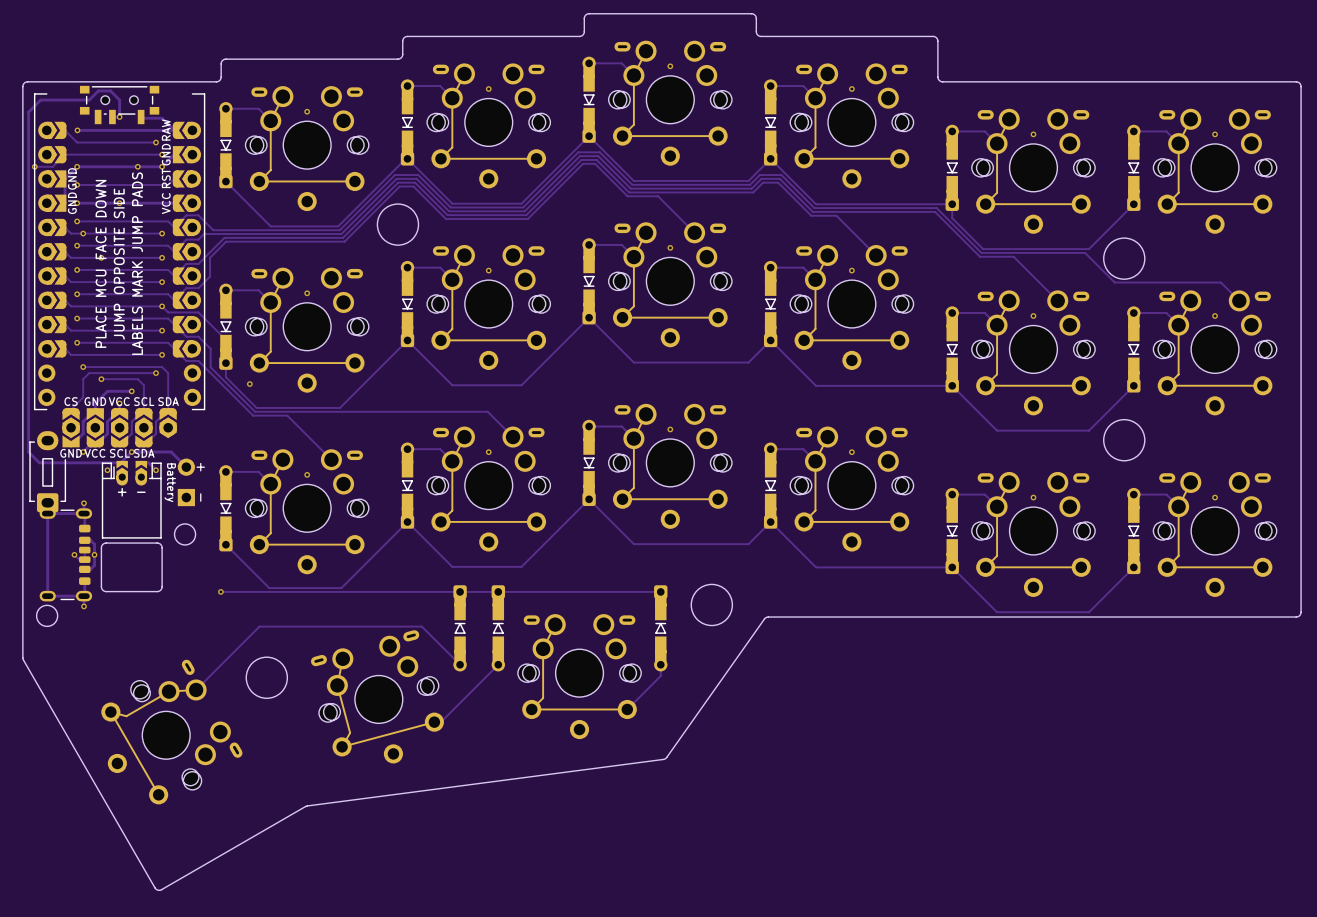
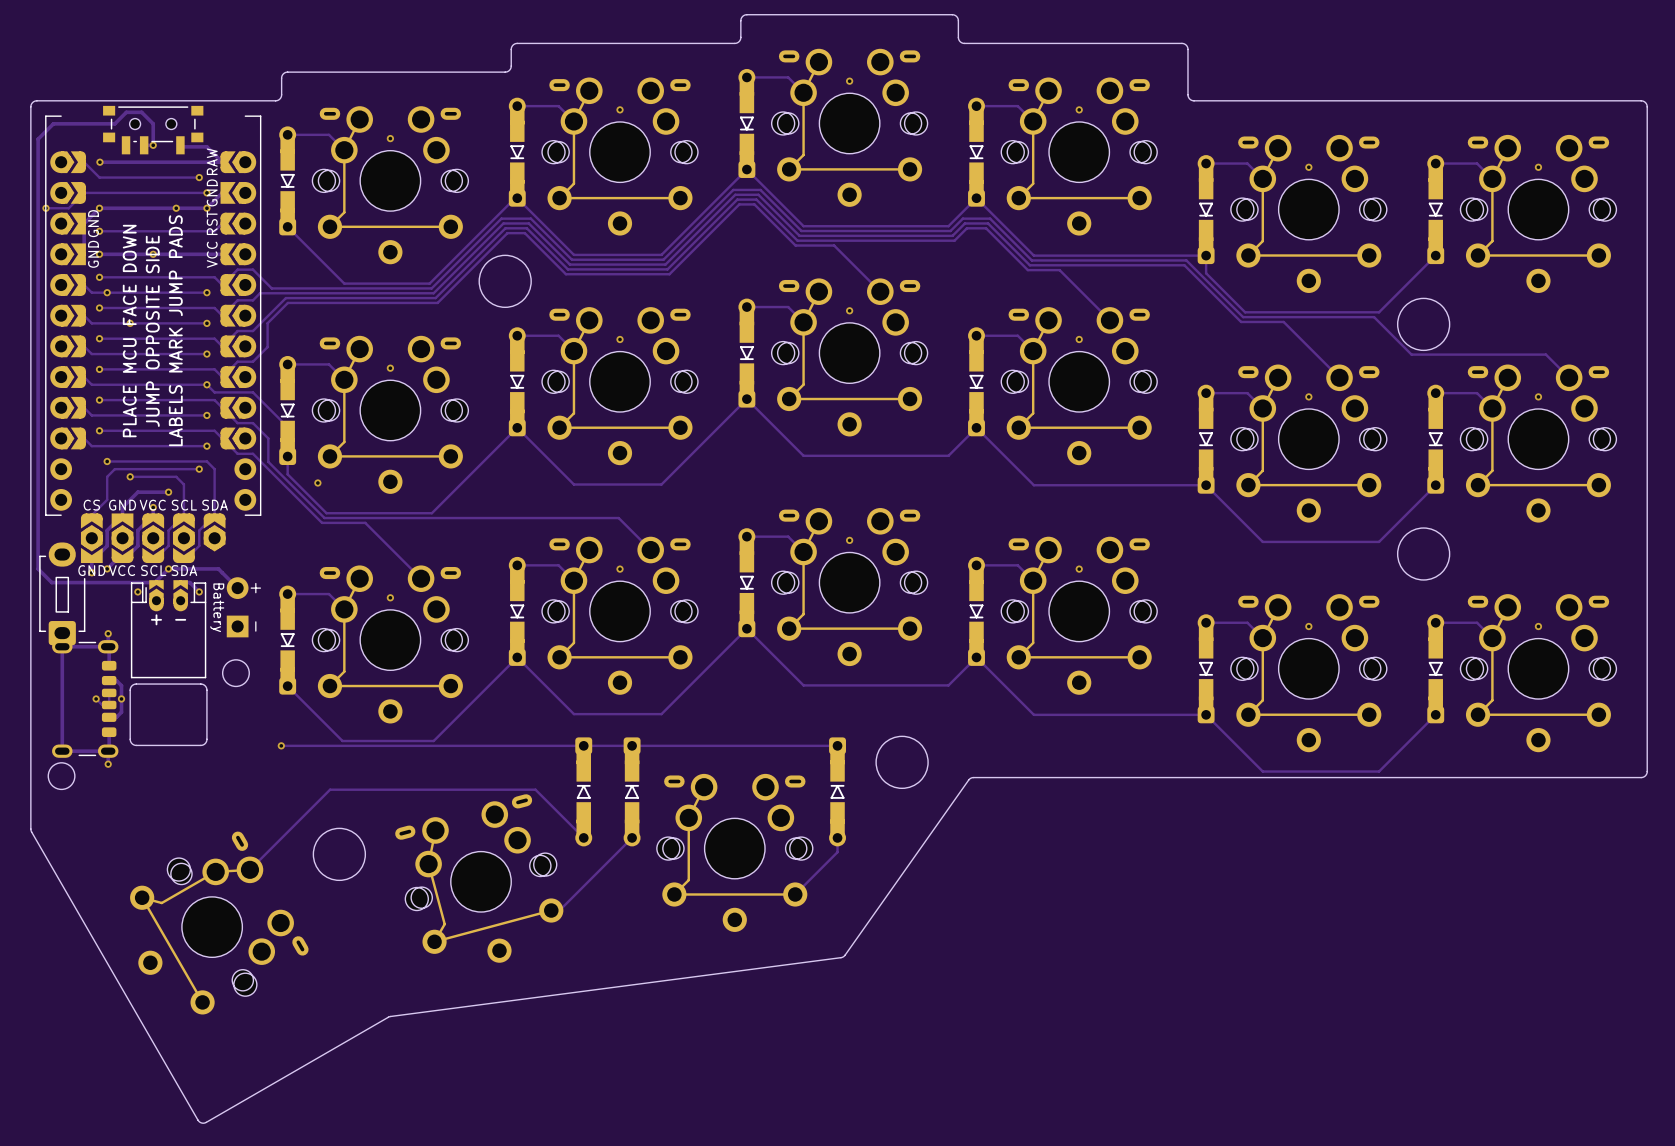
track: none -> (91, 561) (91, 572)
via: none -> (91, 572)

